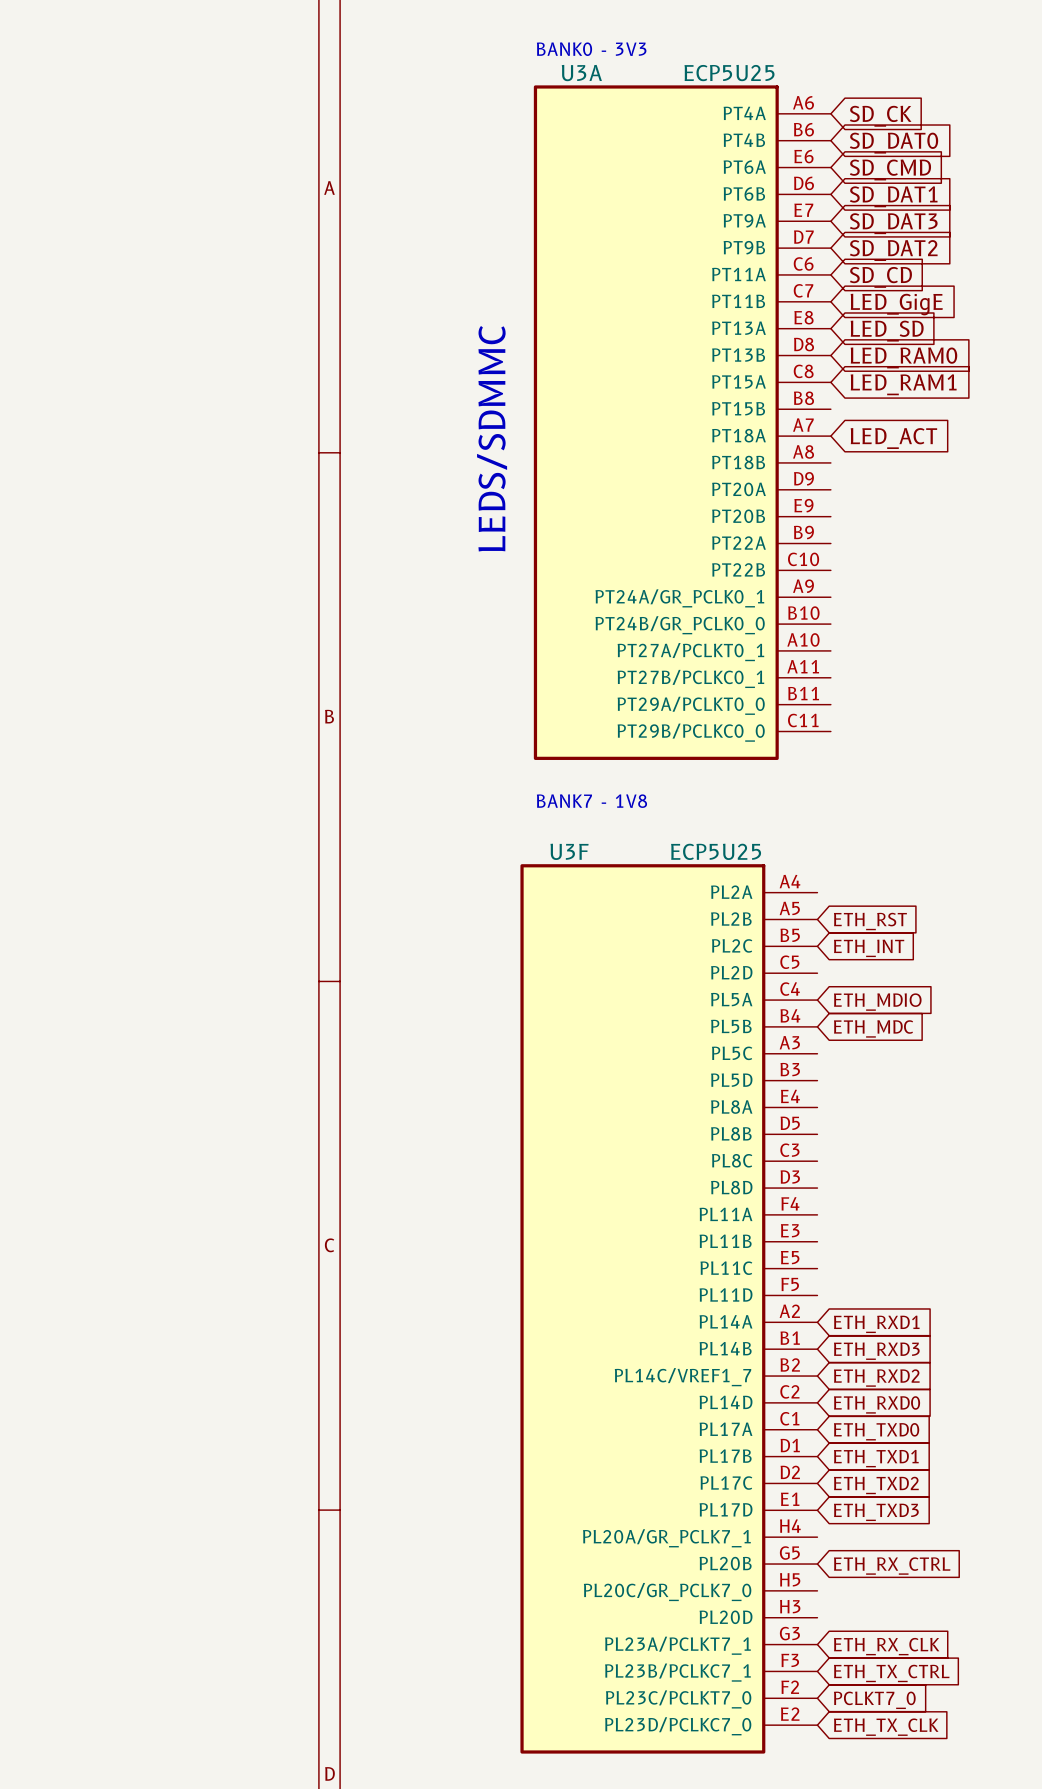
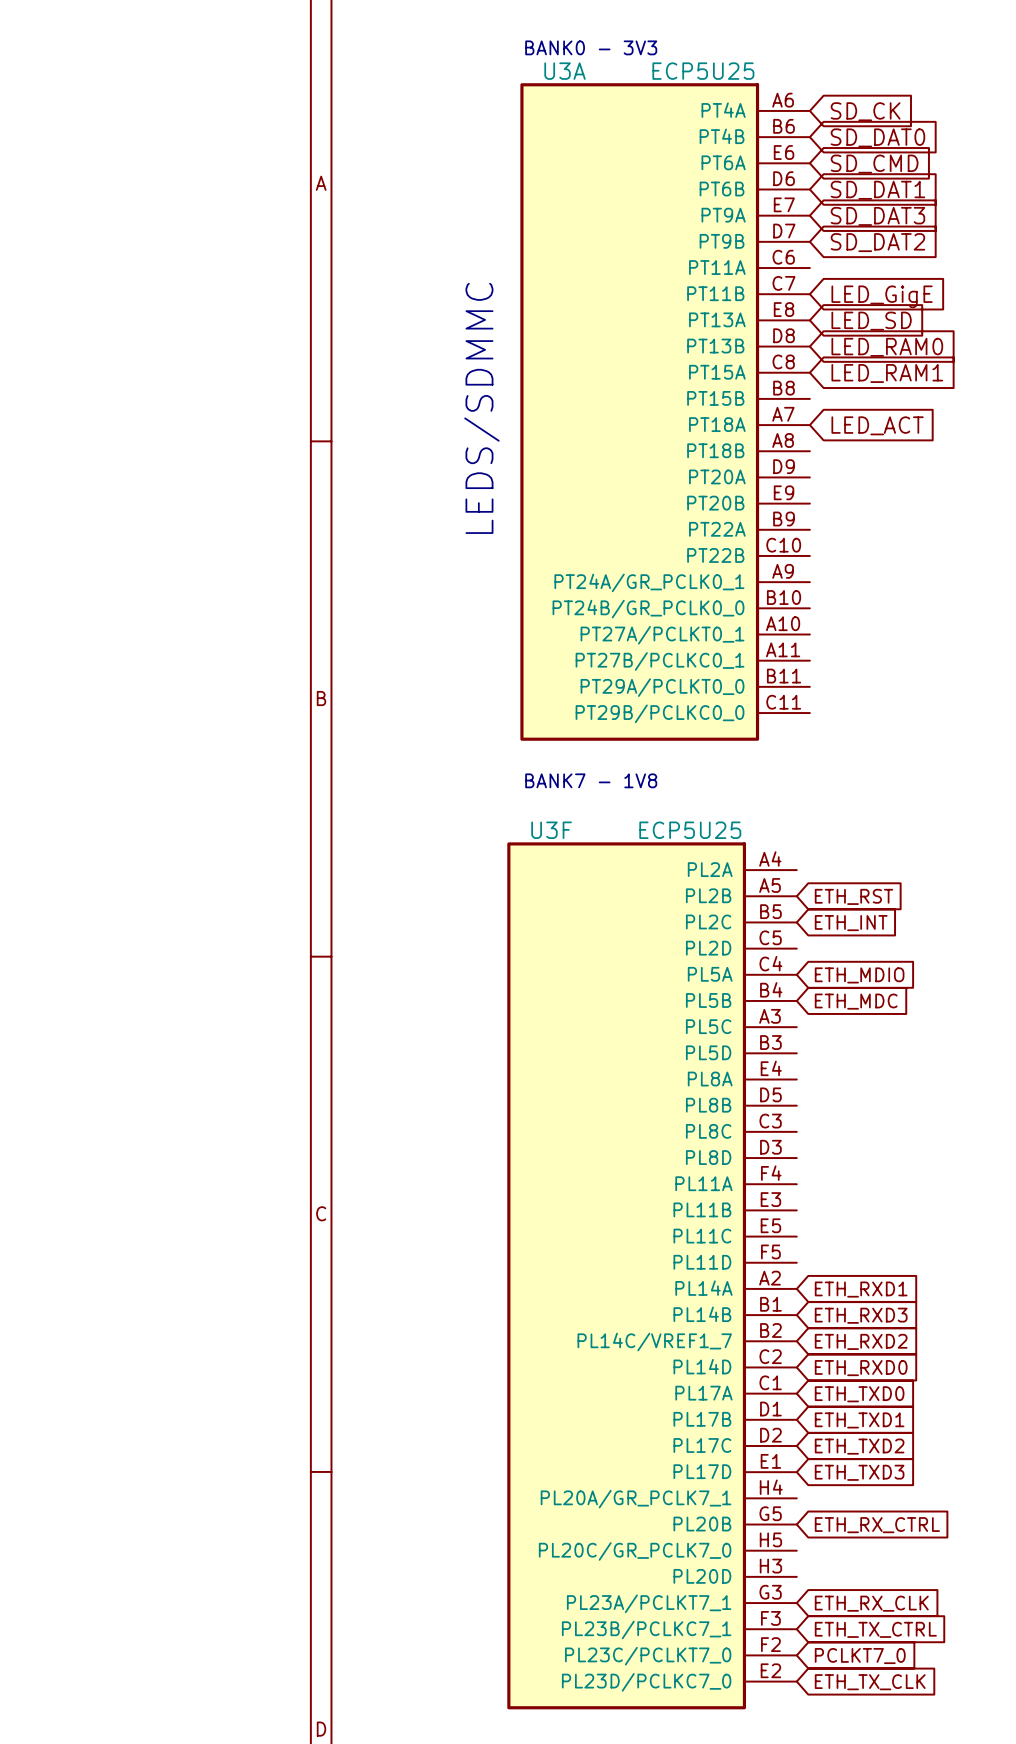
global label: SD_CD (880, 277) -> none

